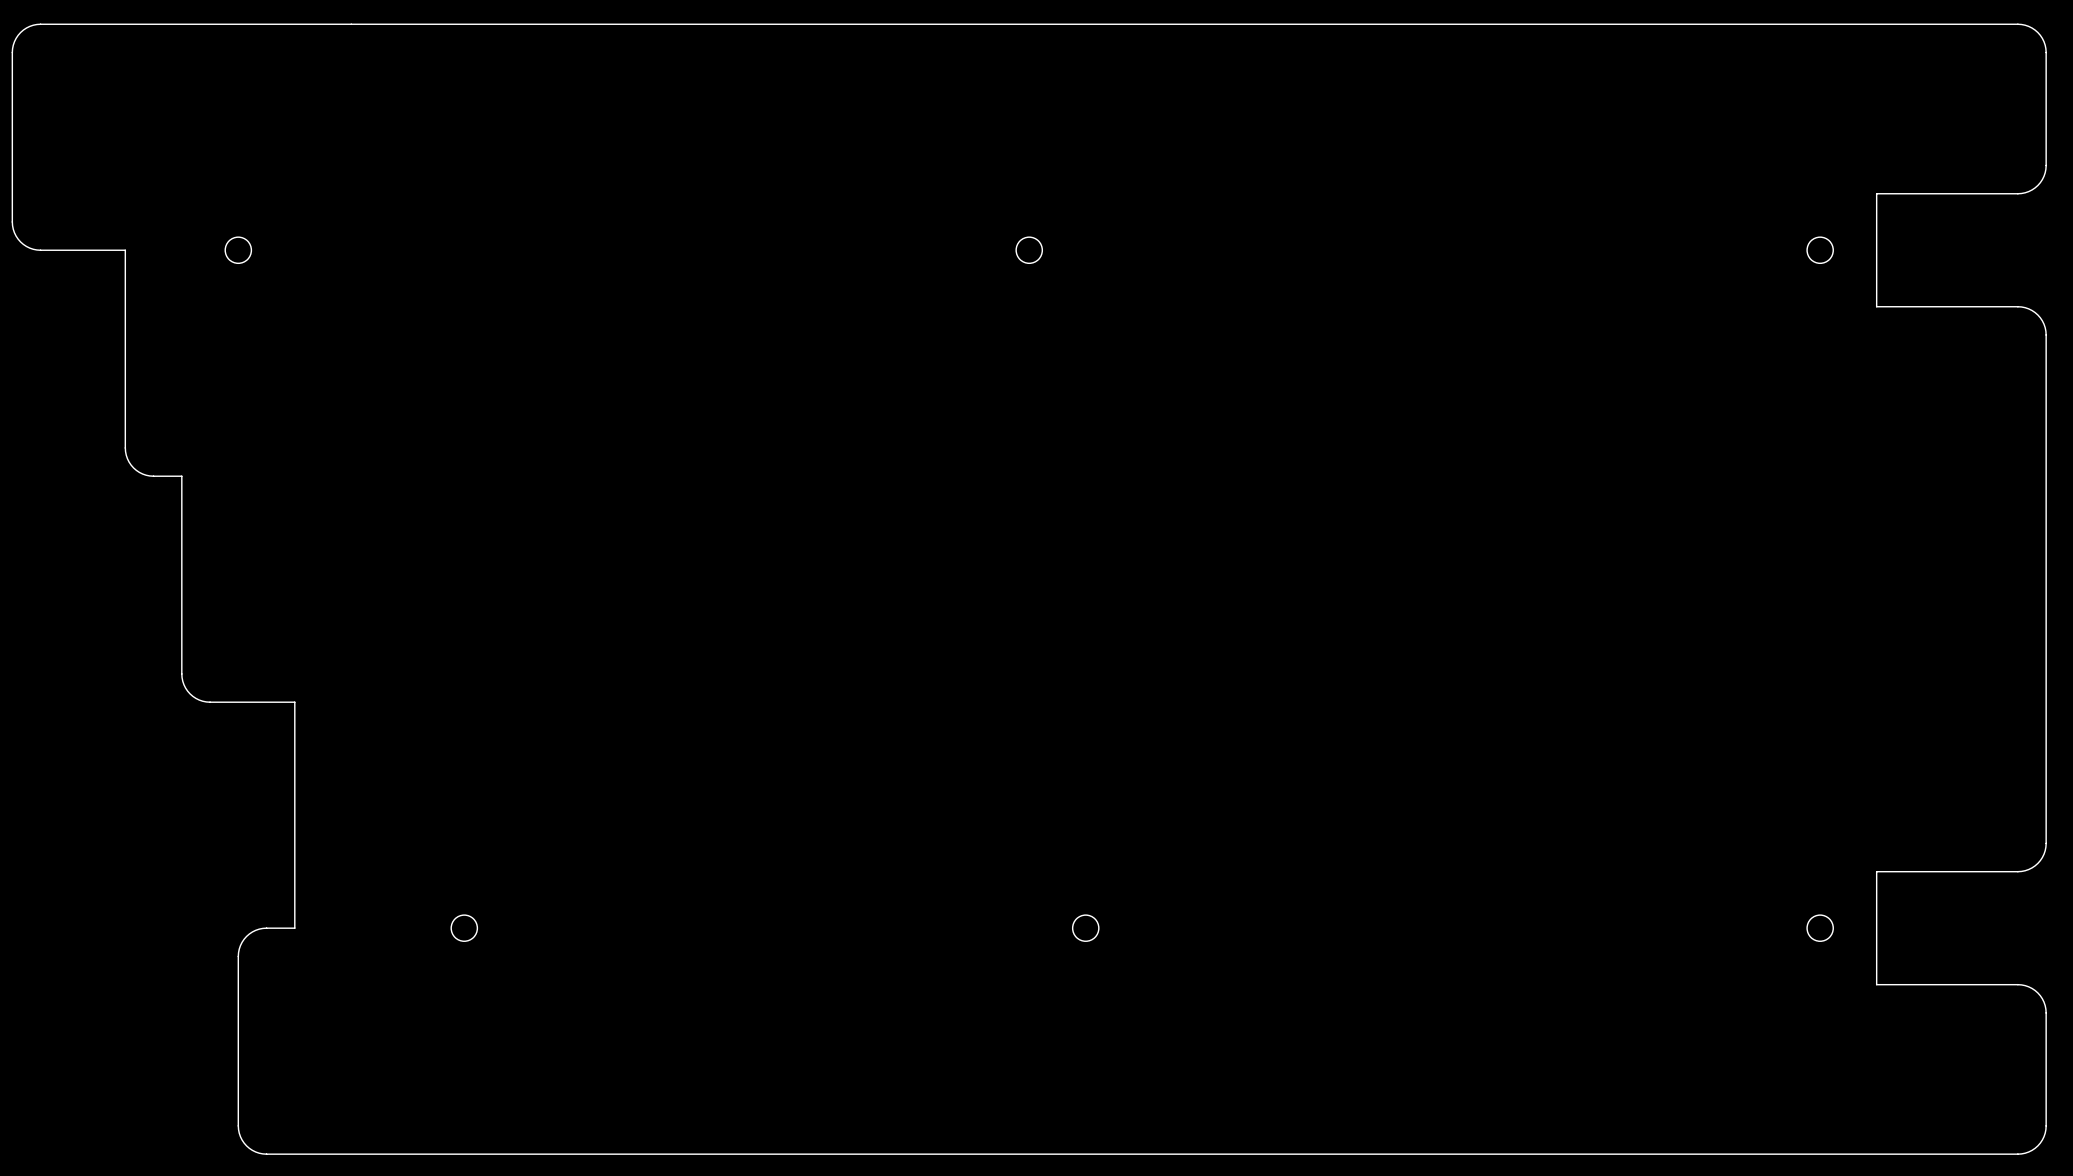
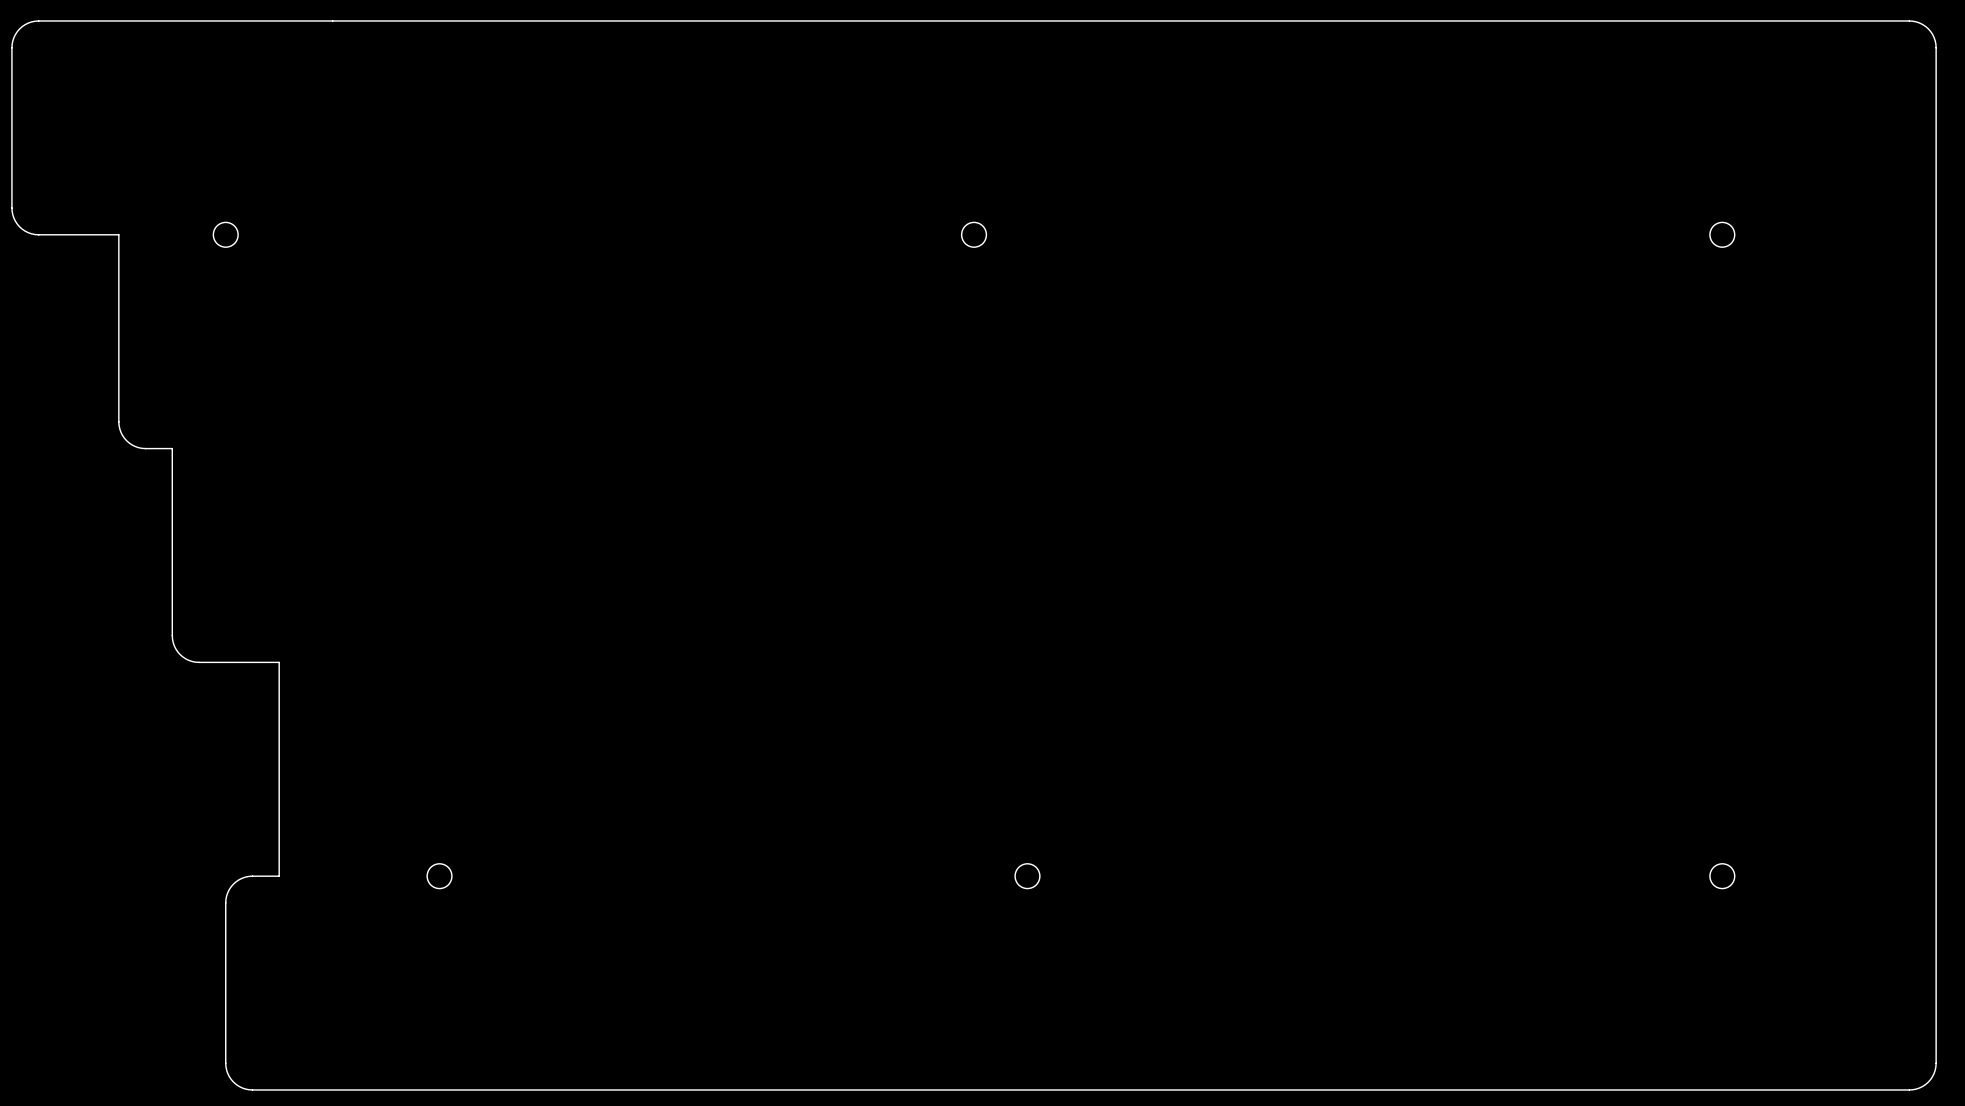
board edge: (2046, 165) (2040, 182) (2032, 189) (2021, 193) (1876, 193) (1876, 306) (2021, 306) (2032, 310) (2040, 317) (2046, 334) -> (1936, 154) (1936, 314)
board edge: (2046, 843) (2040, 860) (2032, 867) (2021, 871) (1876, 871) (1876, 984) (2021, 984) (2032, 988) (2040, 995) (2046, 1012) -> (1936, 796) (1936, 956)

